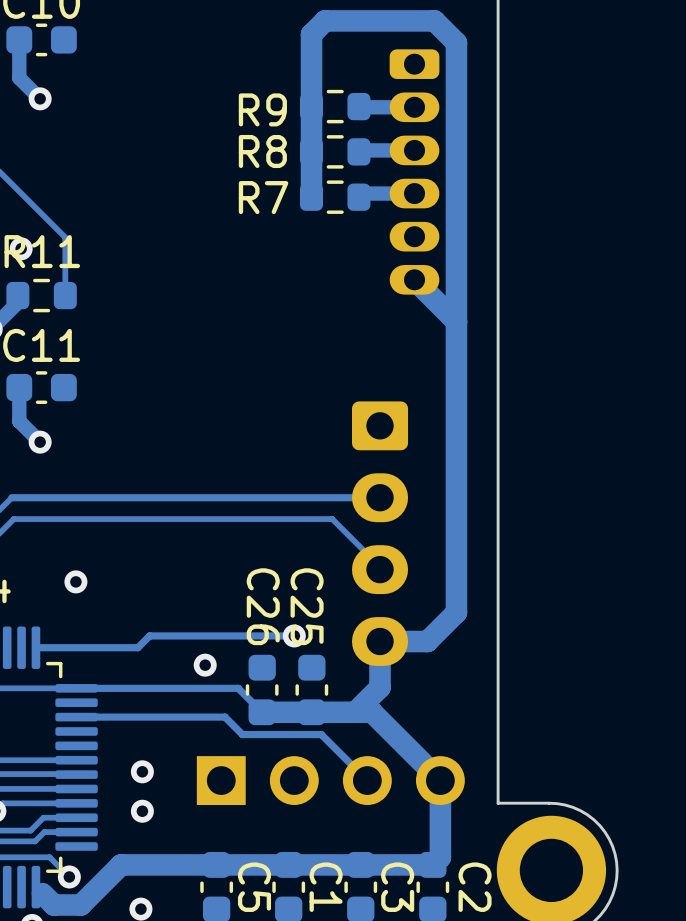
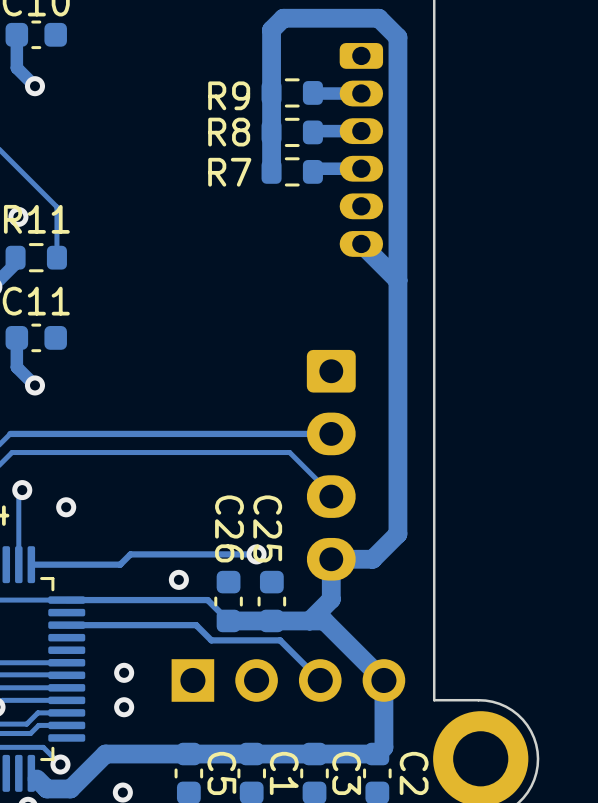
track: none -> (22, 490) (18, 493) (18, 564)
via: none -> (22, 490)

